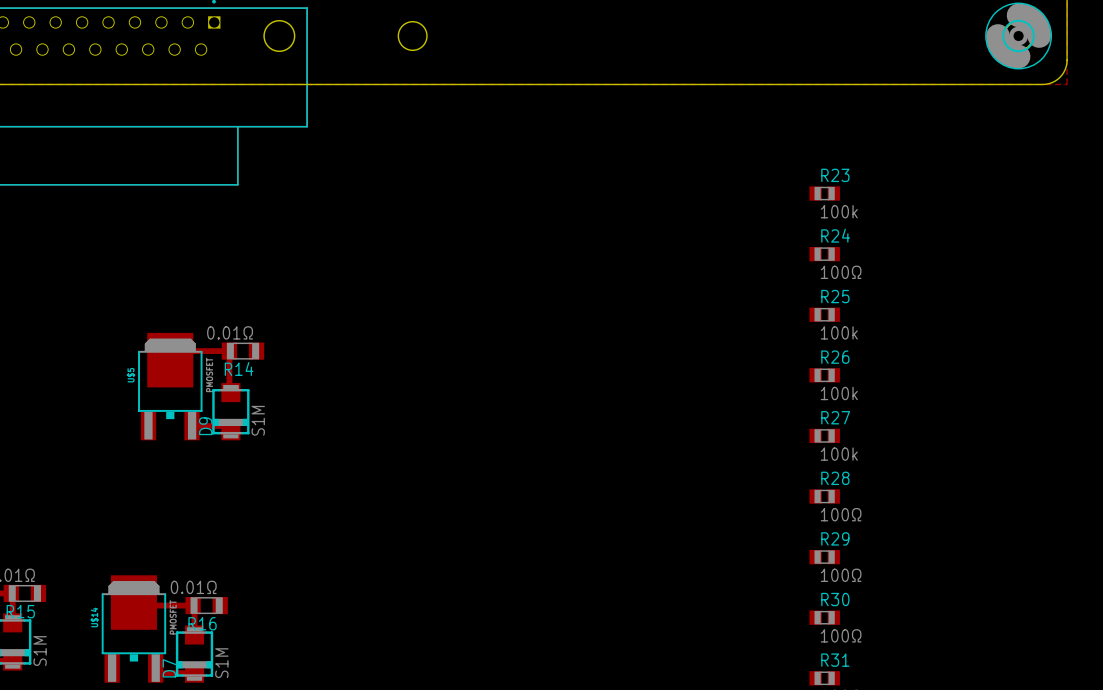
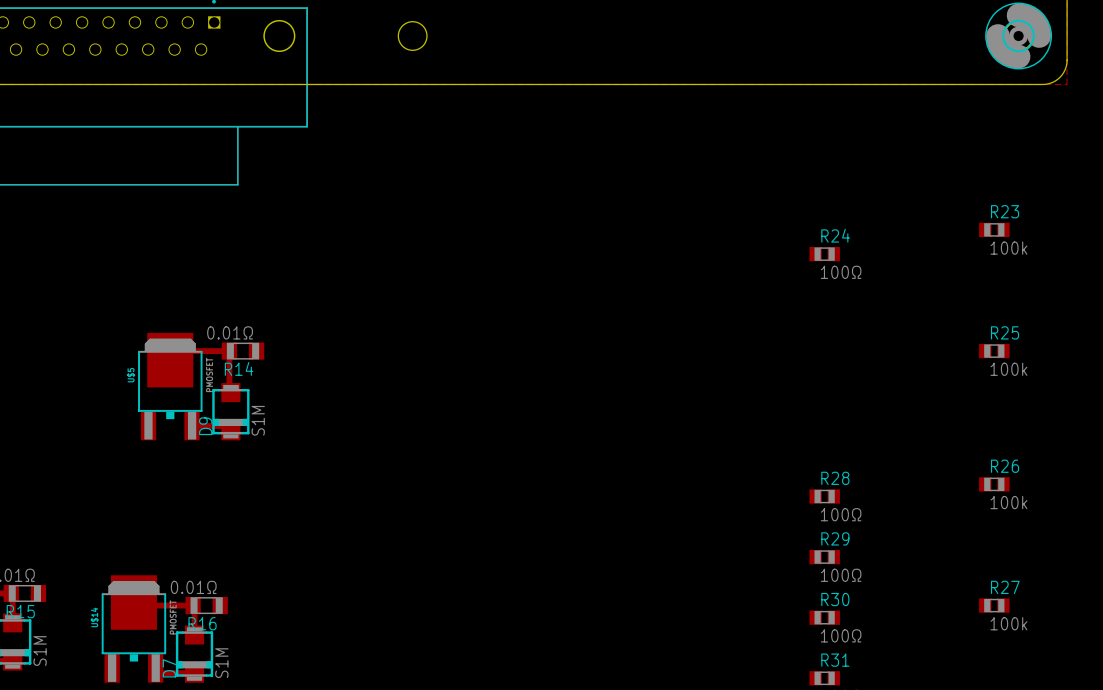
R23 position: (824, 193) -> (994, 229)
R25 position: (824, 314) -> (994, 351)
R26 position: (824, 375) -> (994, 484)
R27 position: (824, 435) -> (994, 605)

